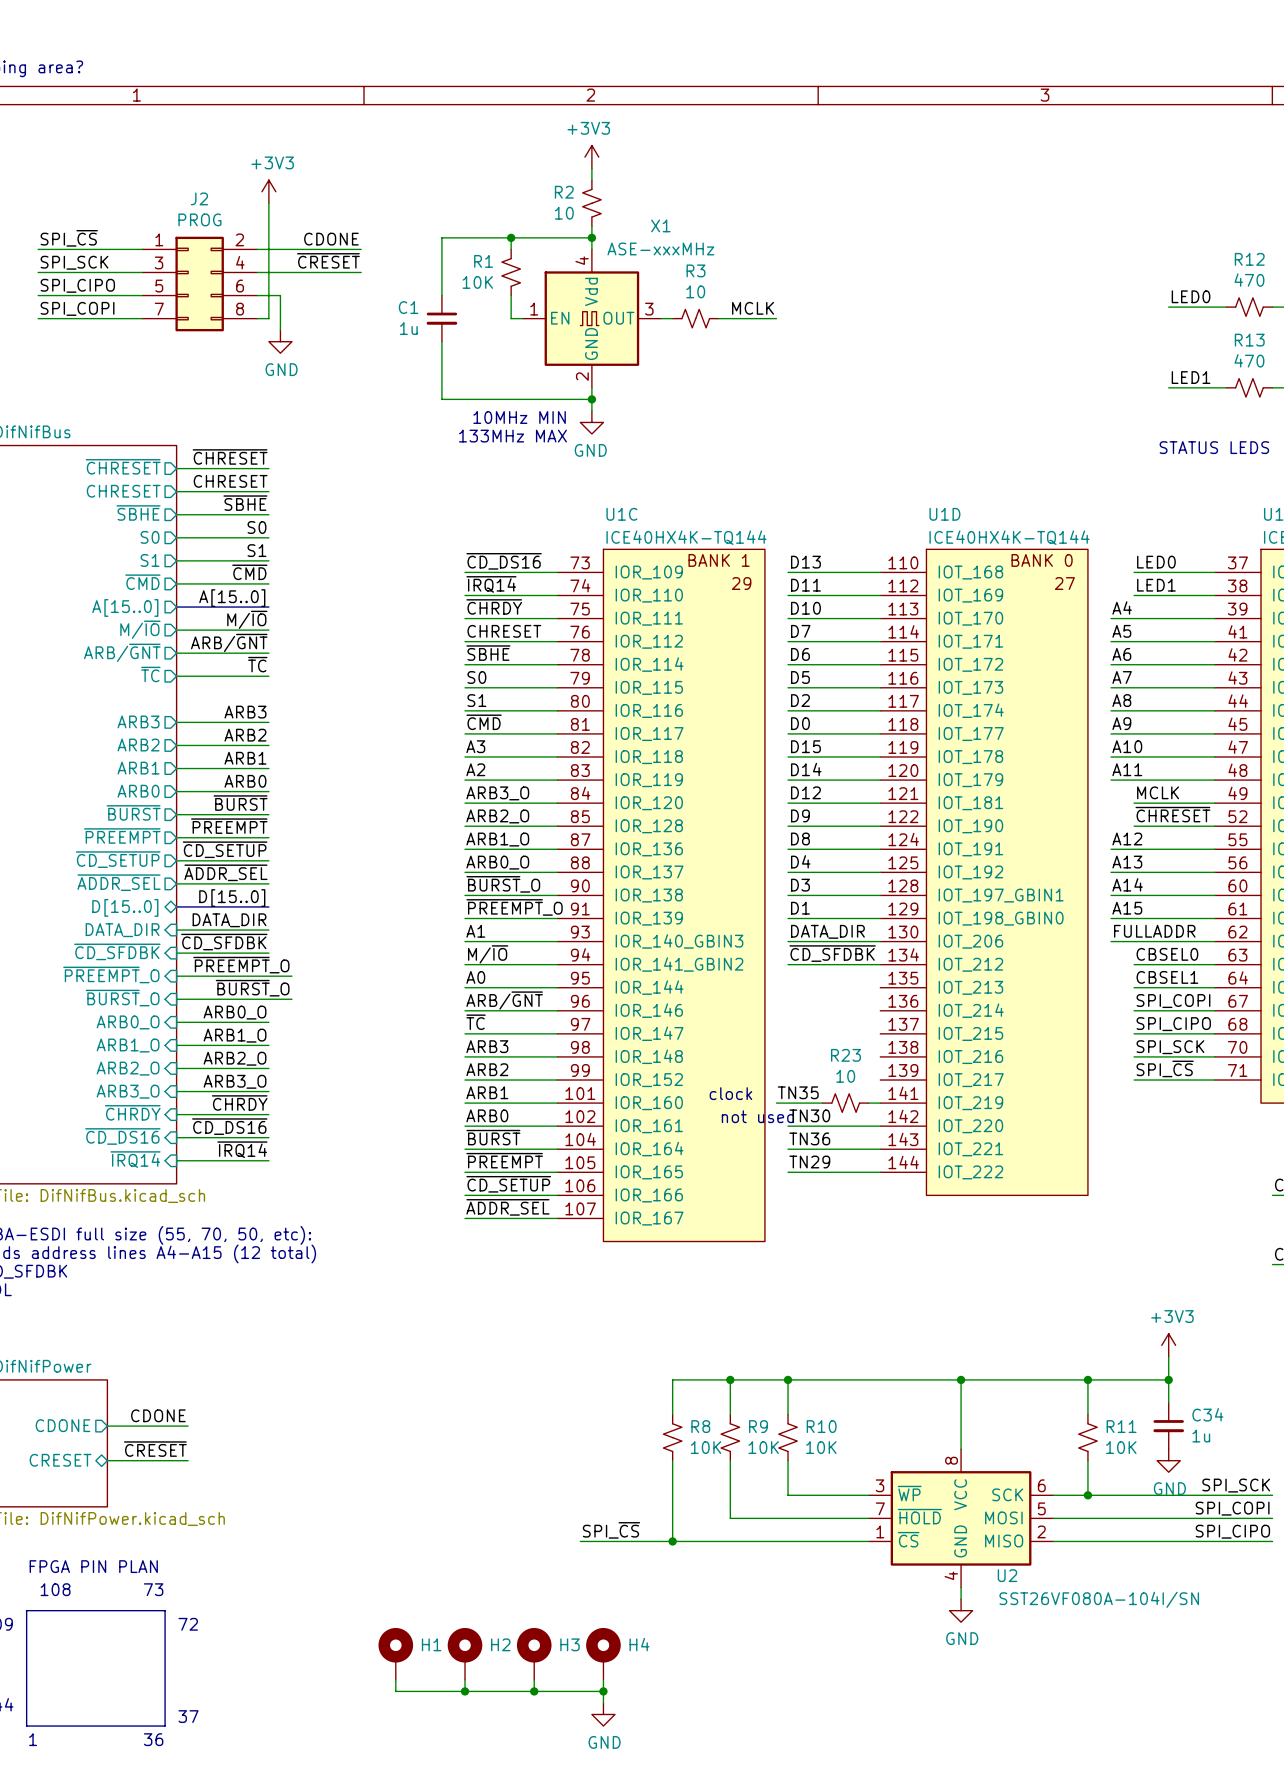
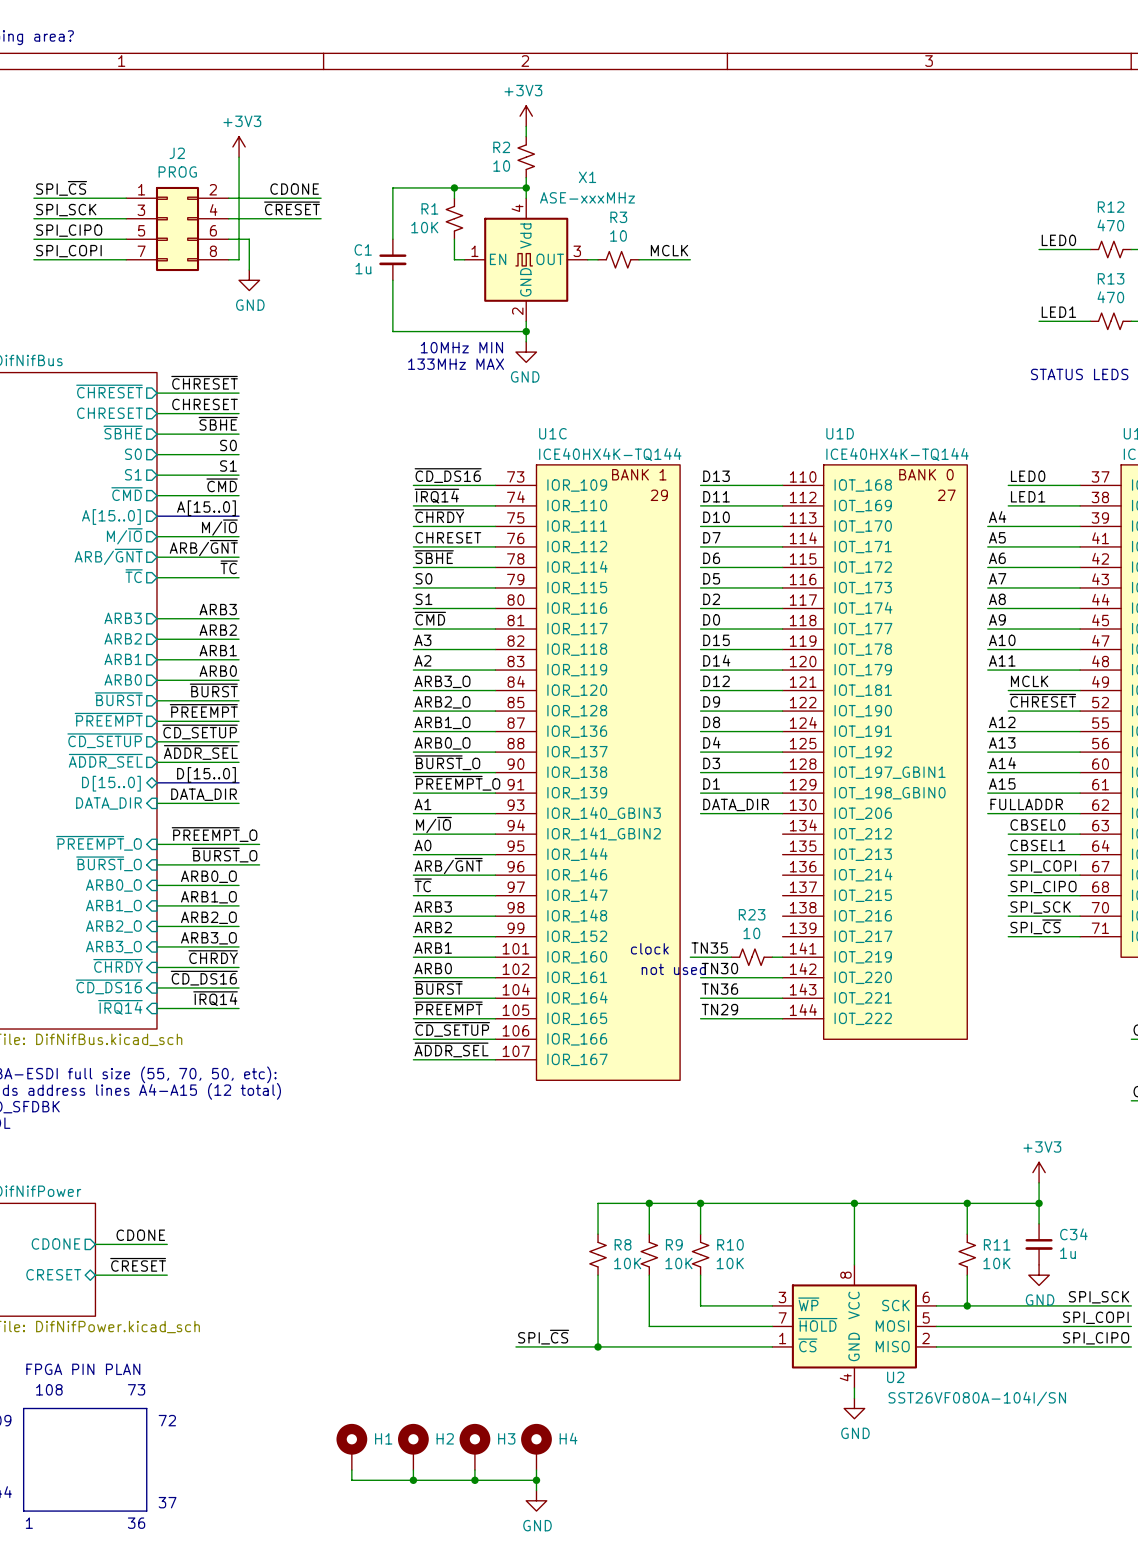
label: ~{CD_SFDBK} (224, 942) -> none
sheet pin: ~{CD_SFDBK} (117, 951) -> none
wire: (176, 953) (268, 953) -> none
label: ~{CD_SFDBK} (832, 953) -> none
wire: (788, 964) (880, 964) -> none

